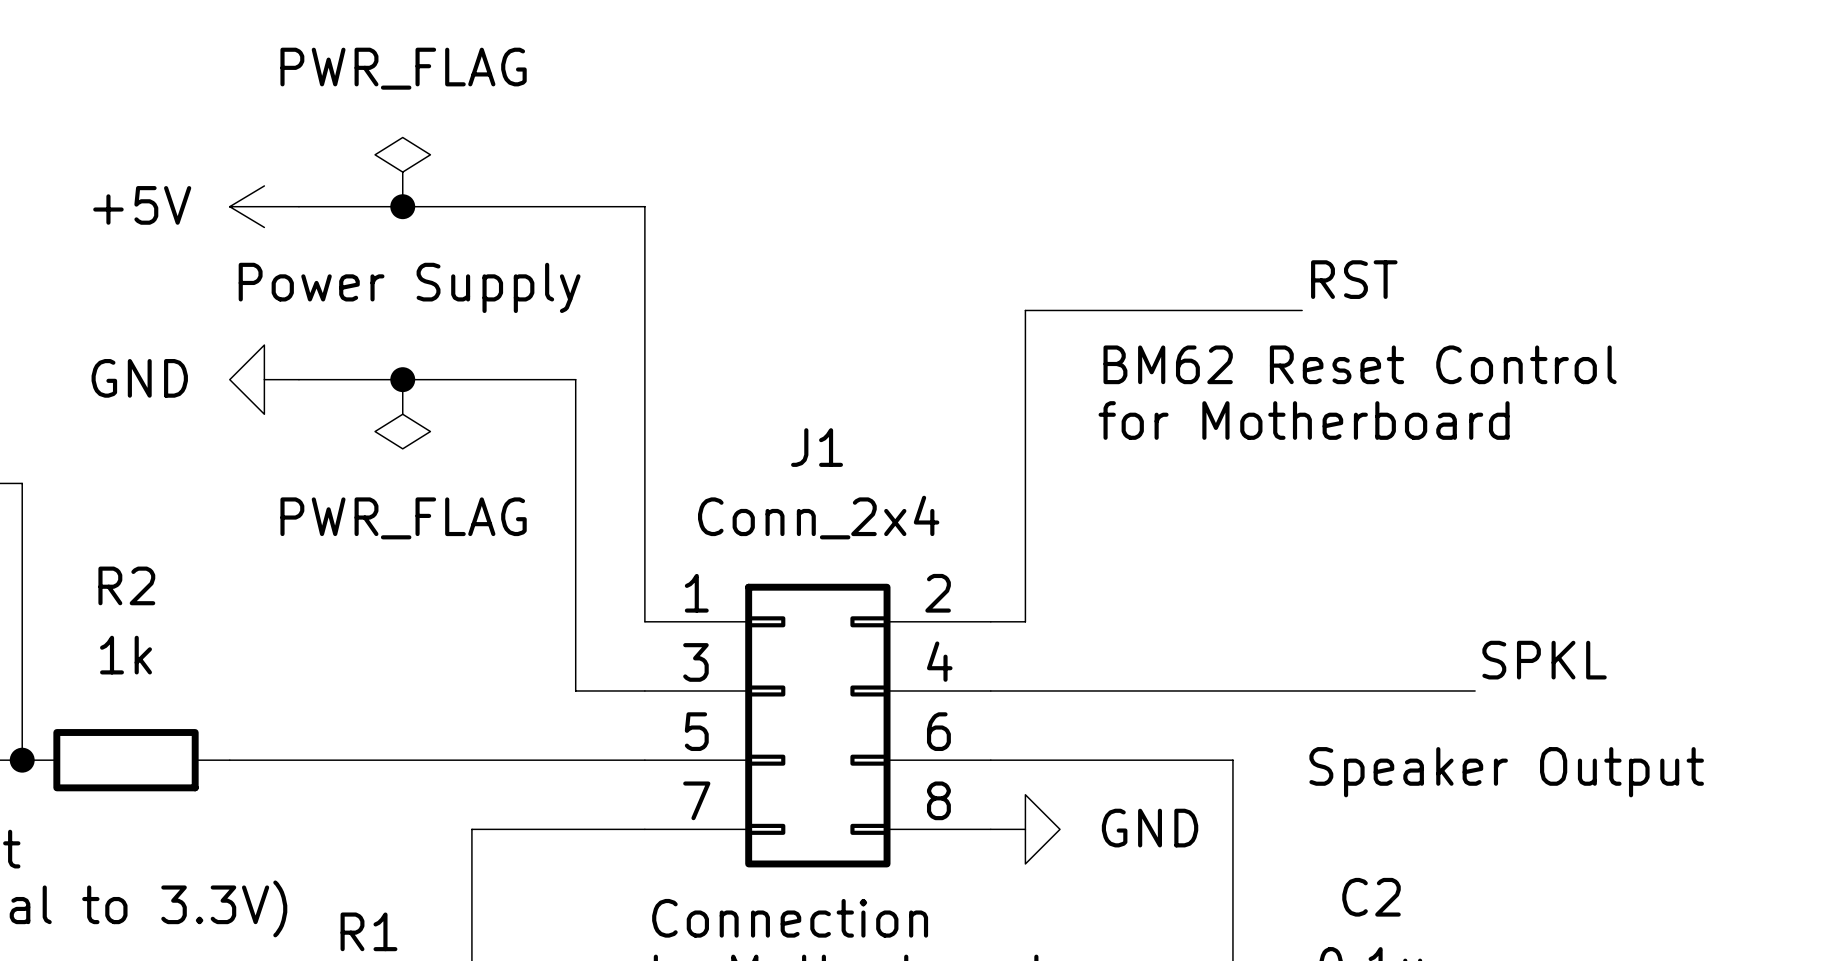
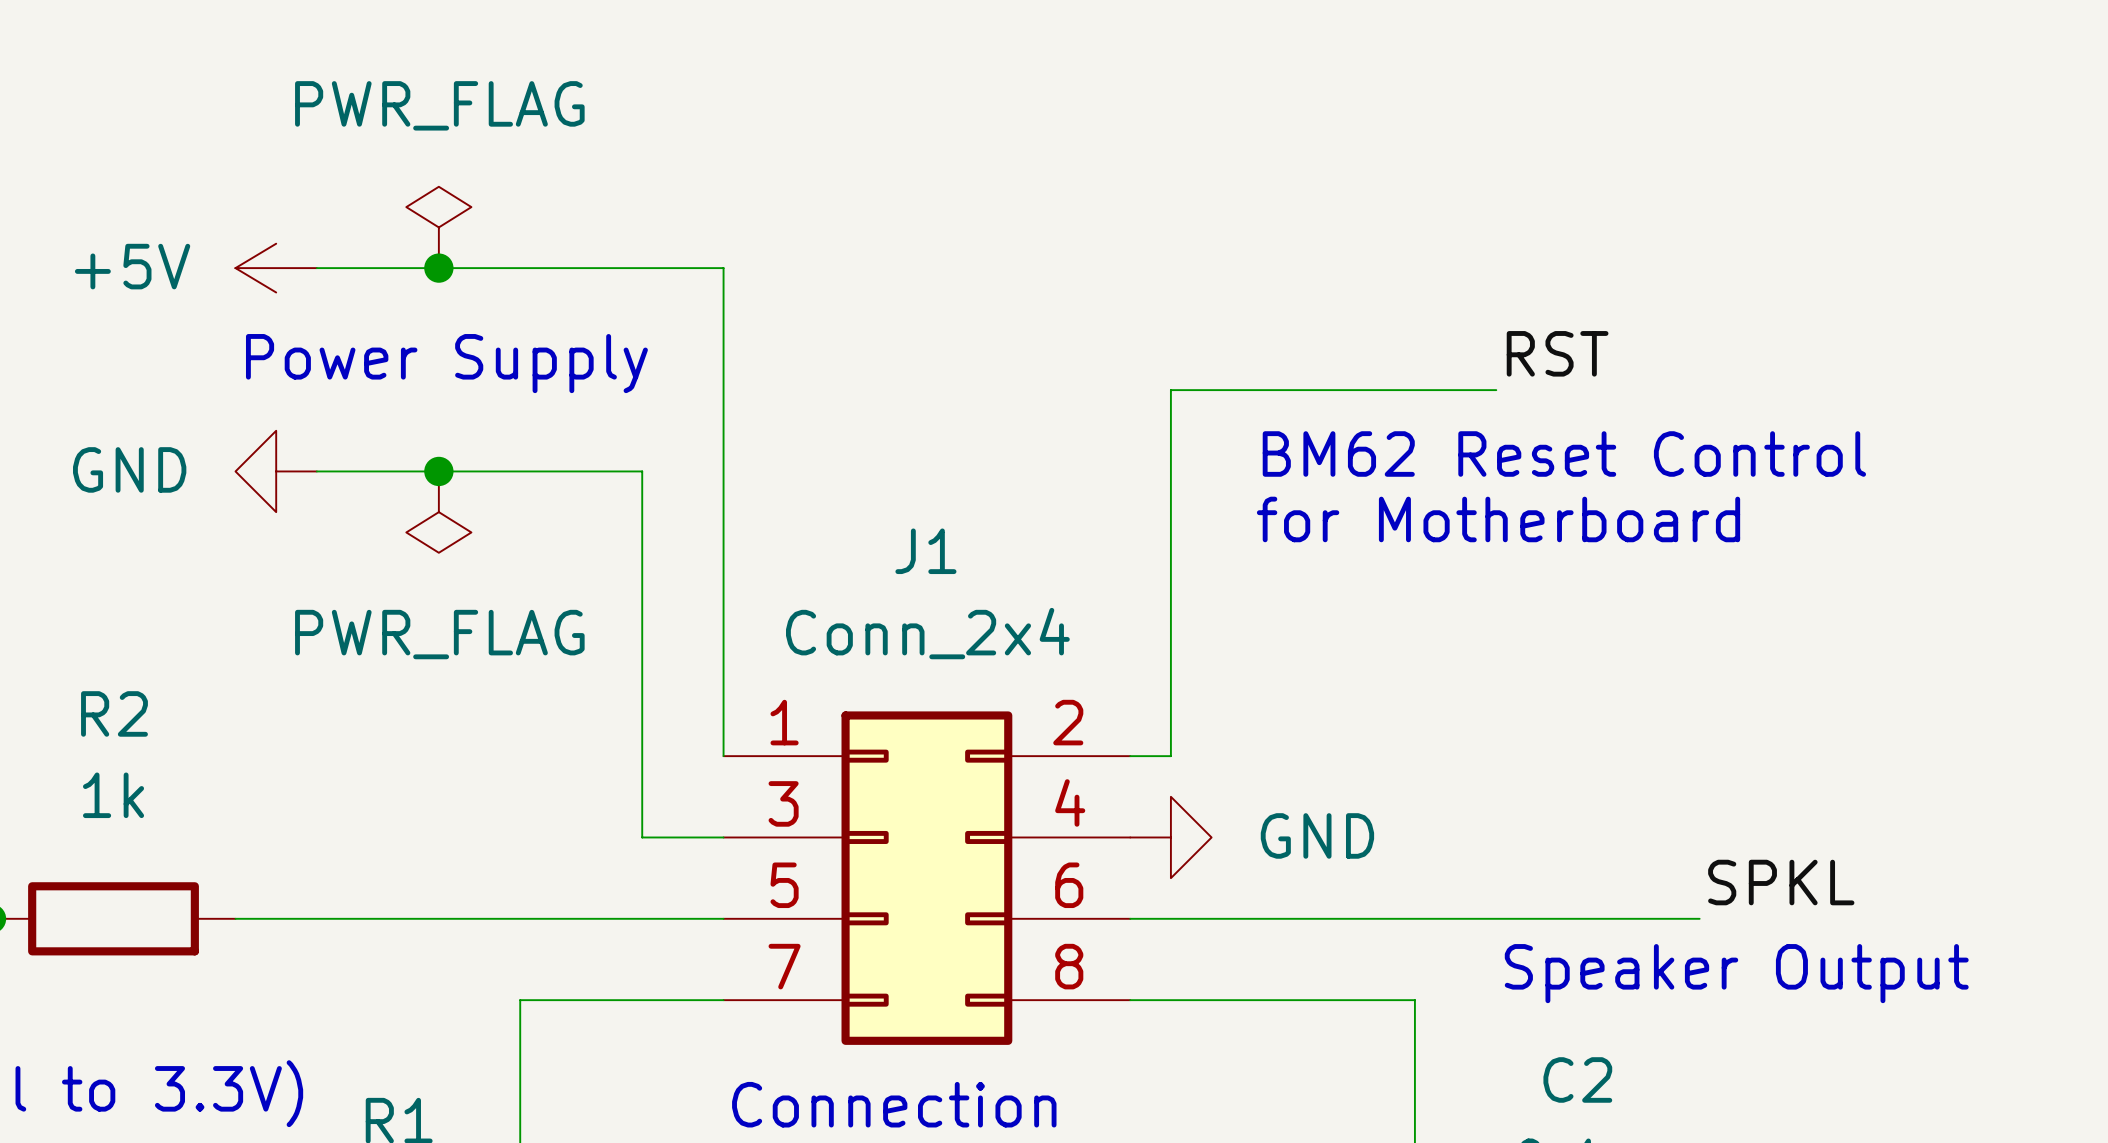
label position: SPKL (1544, 660) -> SPKL (1781, 882)
wire: (990, 690) (1475, 690) -> none
wire: (1232, 760) (1232, 829) -> (1130, 1000) (1414, 1000)
wire: none -> (1414, 918) (1699, 918)
text position: Speaker Output (1506, 772) -> Speaker Output (1736, 973)
power symbol position: GND (1025, 829) -> GND (1170, 837)

